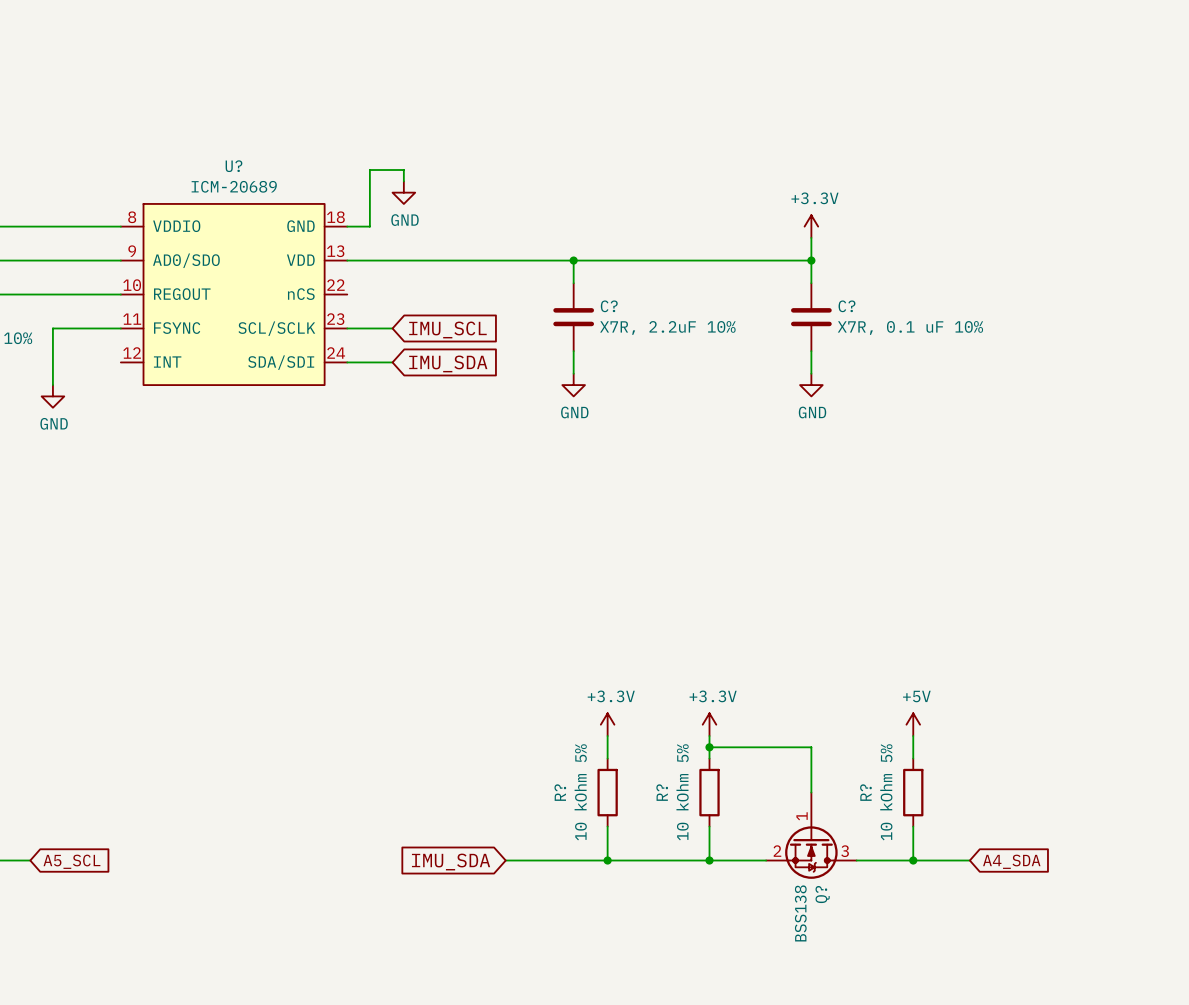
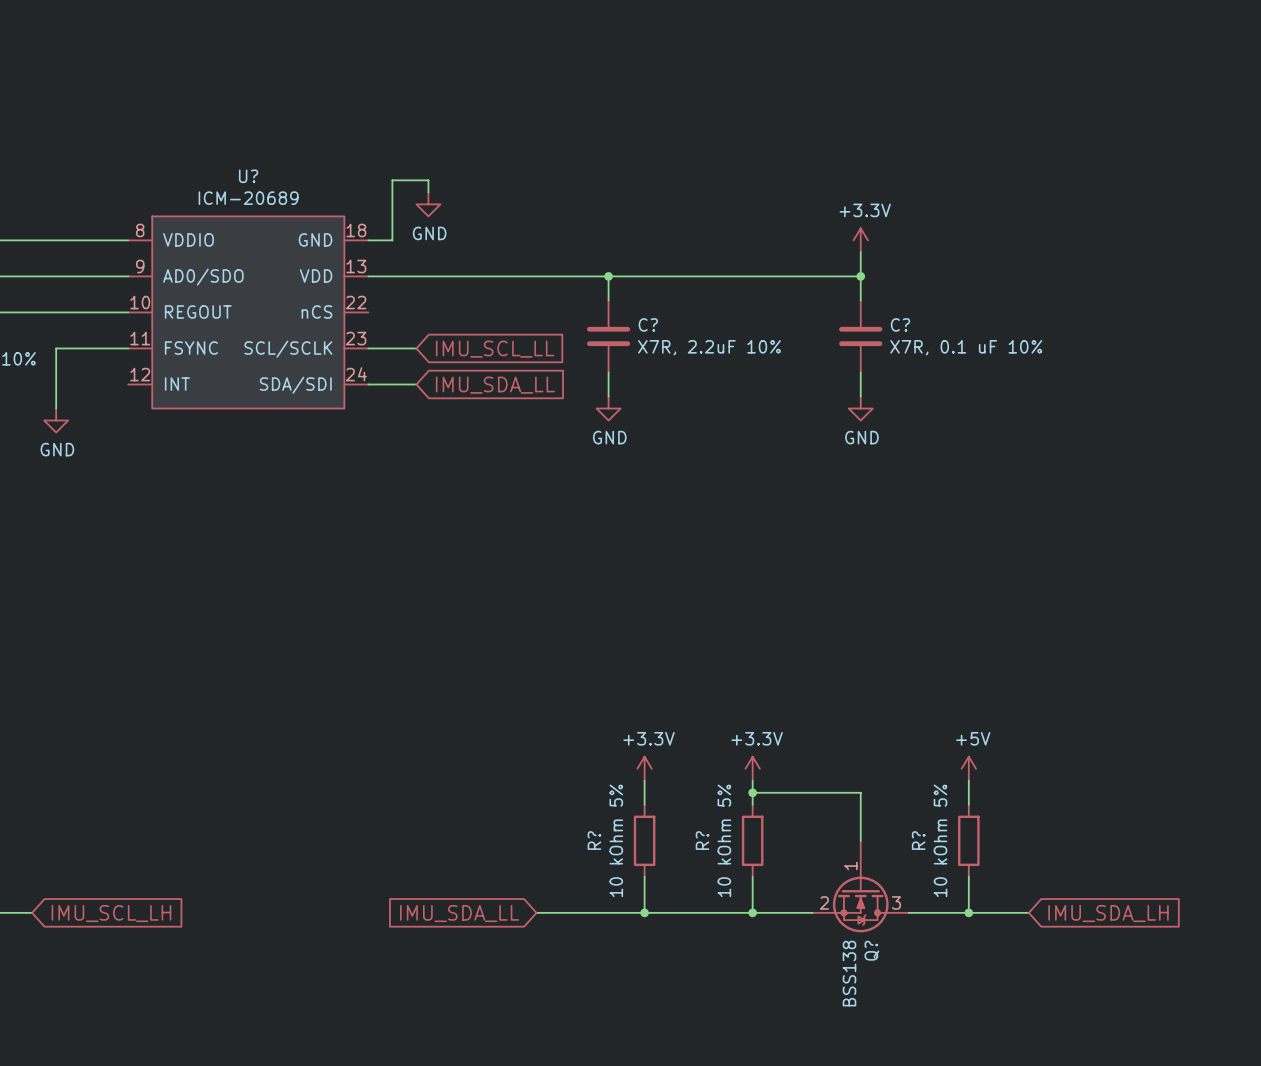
global label: IMU_SCL (447, 329) -> IMU_SCL_LL (495, 349)
global label: IMU_SDA (448, 363) -> IMU_SDA_LL (495, 385)
global label: A5_SCL (71, 861) -> IMU_SCL_LH (111, 913)
global label: A4_SDA (1011, 861) -> IMU_SDA_LH (1108, 913)
global label: IMU_SDA (451, 862) -> IMU_SDA_LL (459, 913)

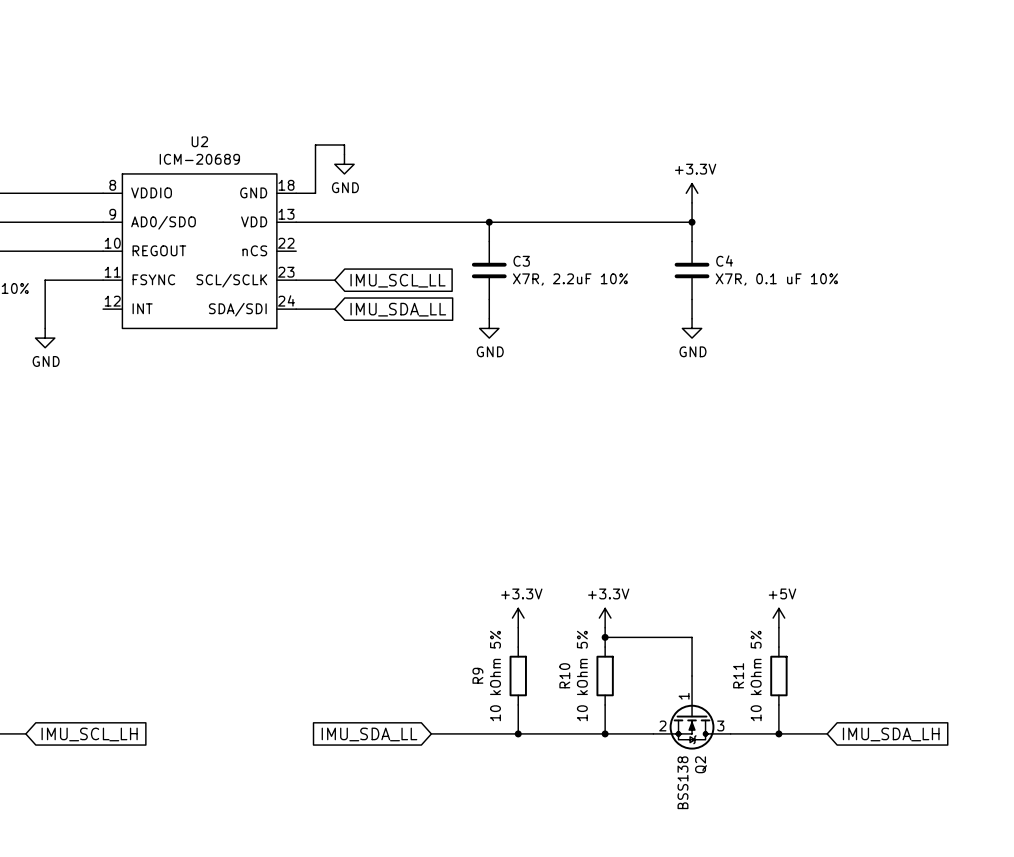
U? name: U? (248, 176) -> U2 (199, 141)
C? name: C? (648, 324) -> C3 (521, 261)
C? name: C? (900, 324) -> C4 (724, 261)
R? name: R? (594, 840) -> R9 (477, 675)
R? name: R? (702, 840) -> R10 (564, 675)
R? name: R? (918, 840) -> R11 (738, 675)
Q? name: Q? (871, 950) -> Q2 (701, 764)

